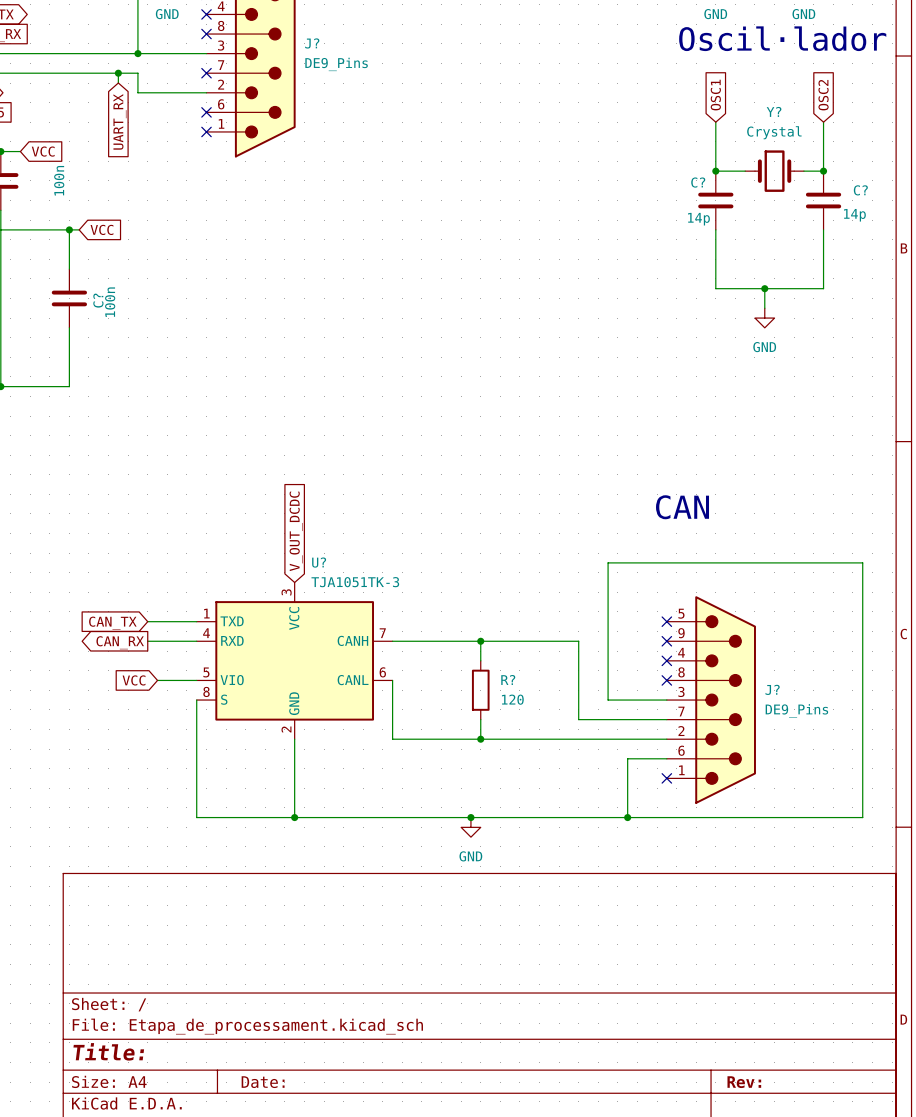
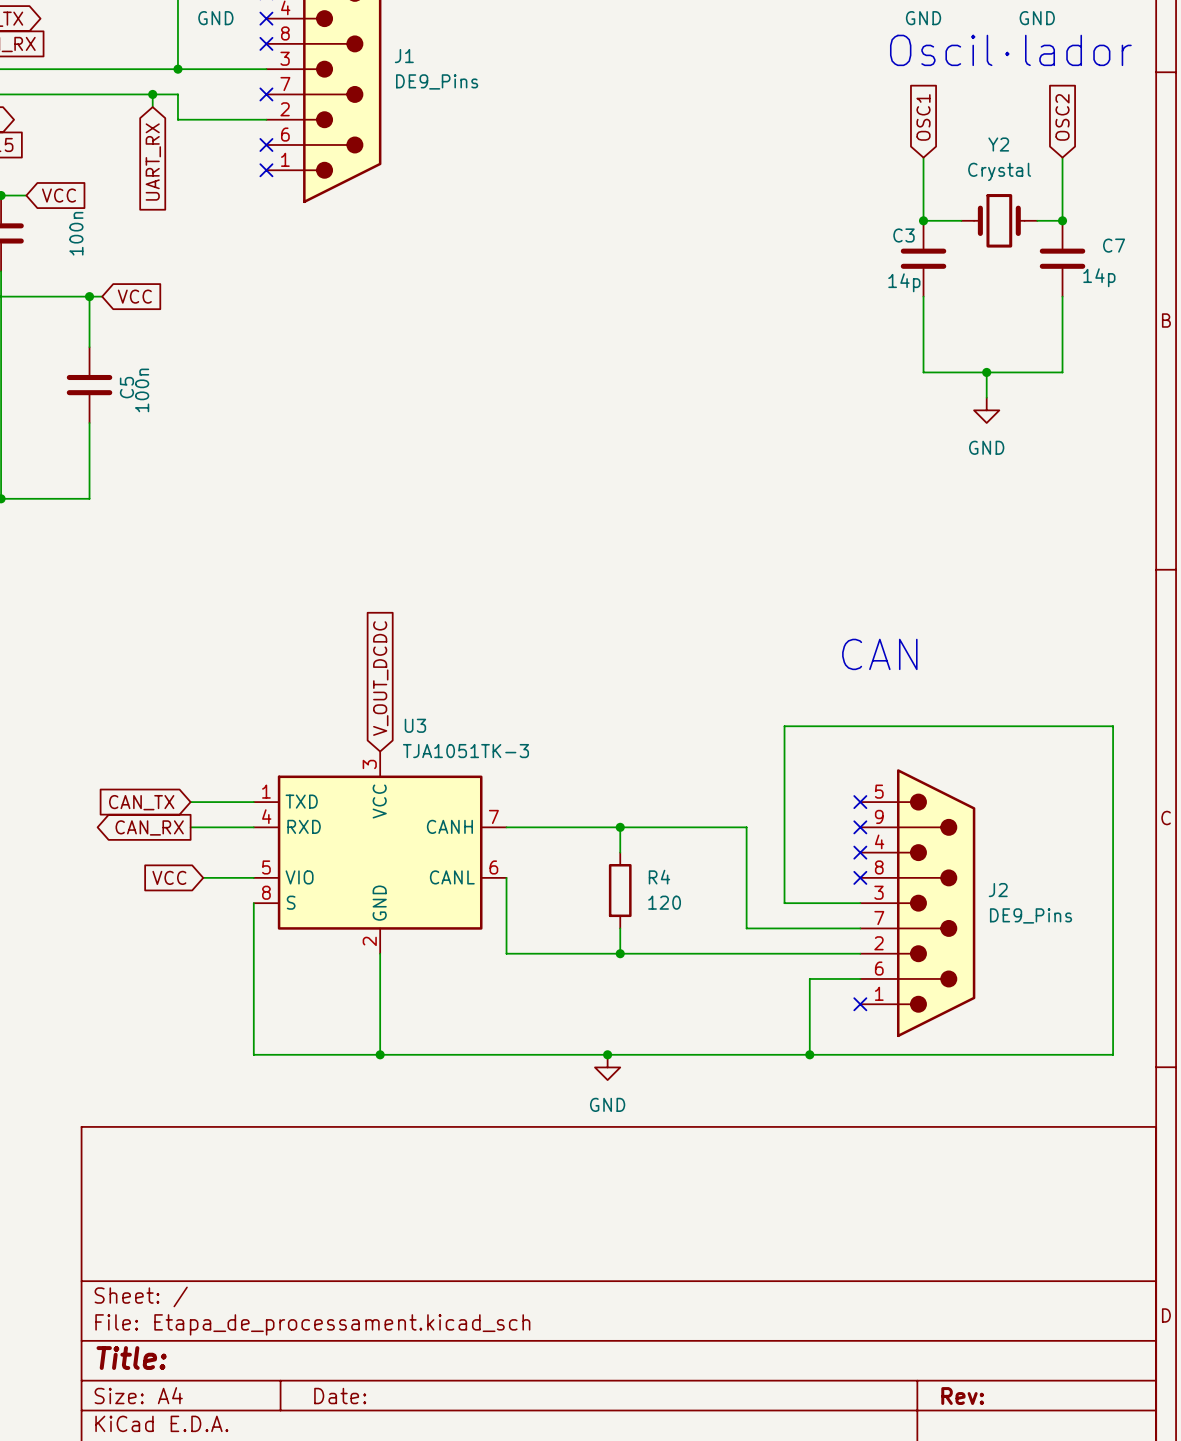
J? name: J? (312, 43) -> J1 (404, 56)
Y? name: Y? (774, 111) -> Y2 (998, 144)
C? name: C? (698, 182) -> C3 (904, 235)
C? name: C? (860, 190) -> C7 (1114, 245)
C? name: C? (98, 300) -> C5 (126, 387)
U? name: U? (319, 562) -> U3 (415, 725)
R? name: R? (508, 679) -> R4 (659, 877)
J? name: J? (772, 689) -> J2 (998, 890)

